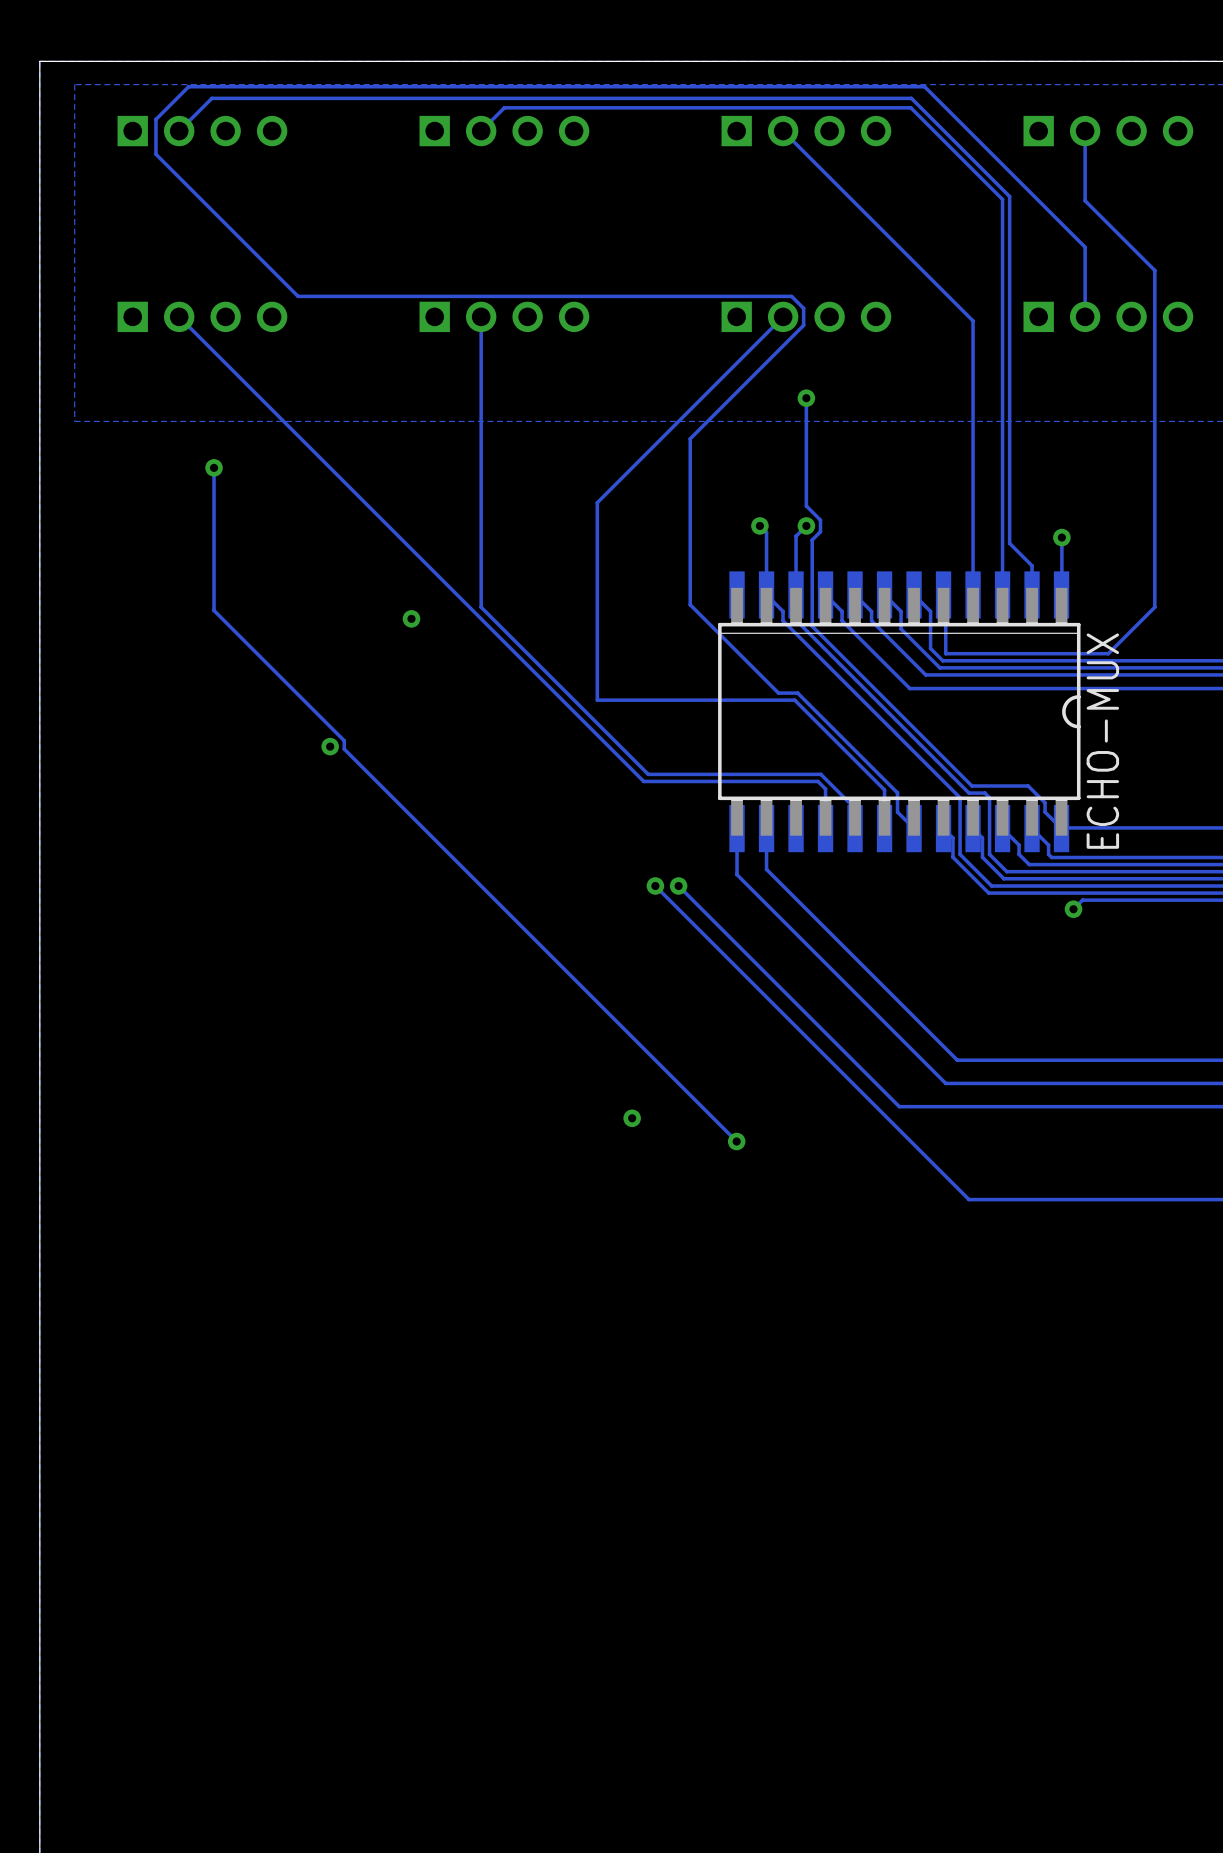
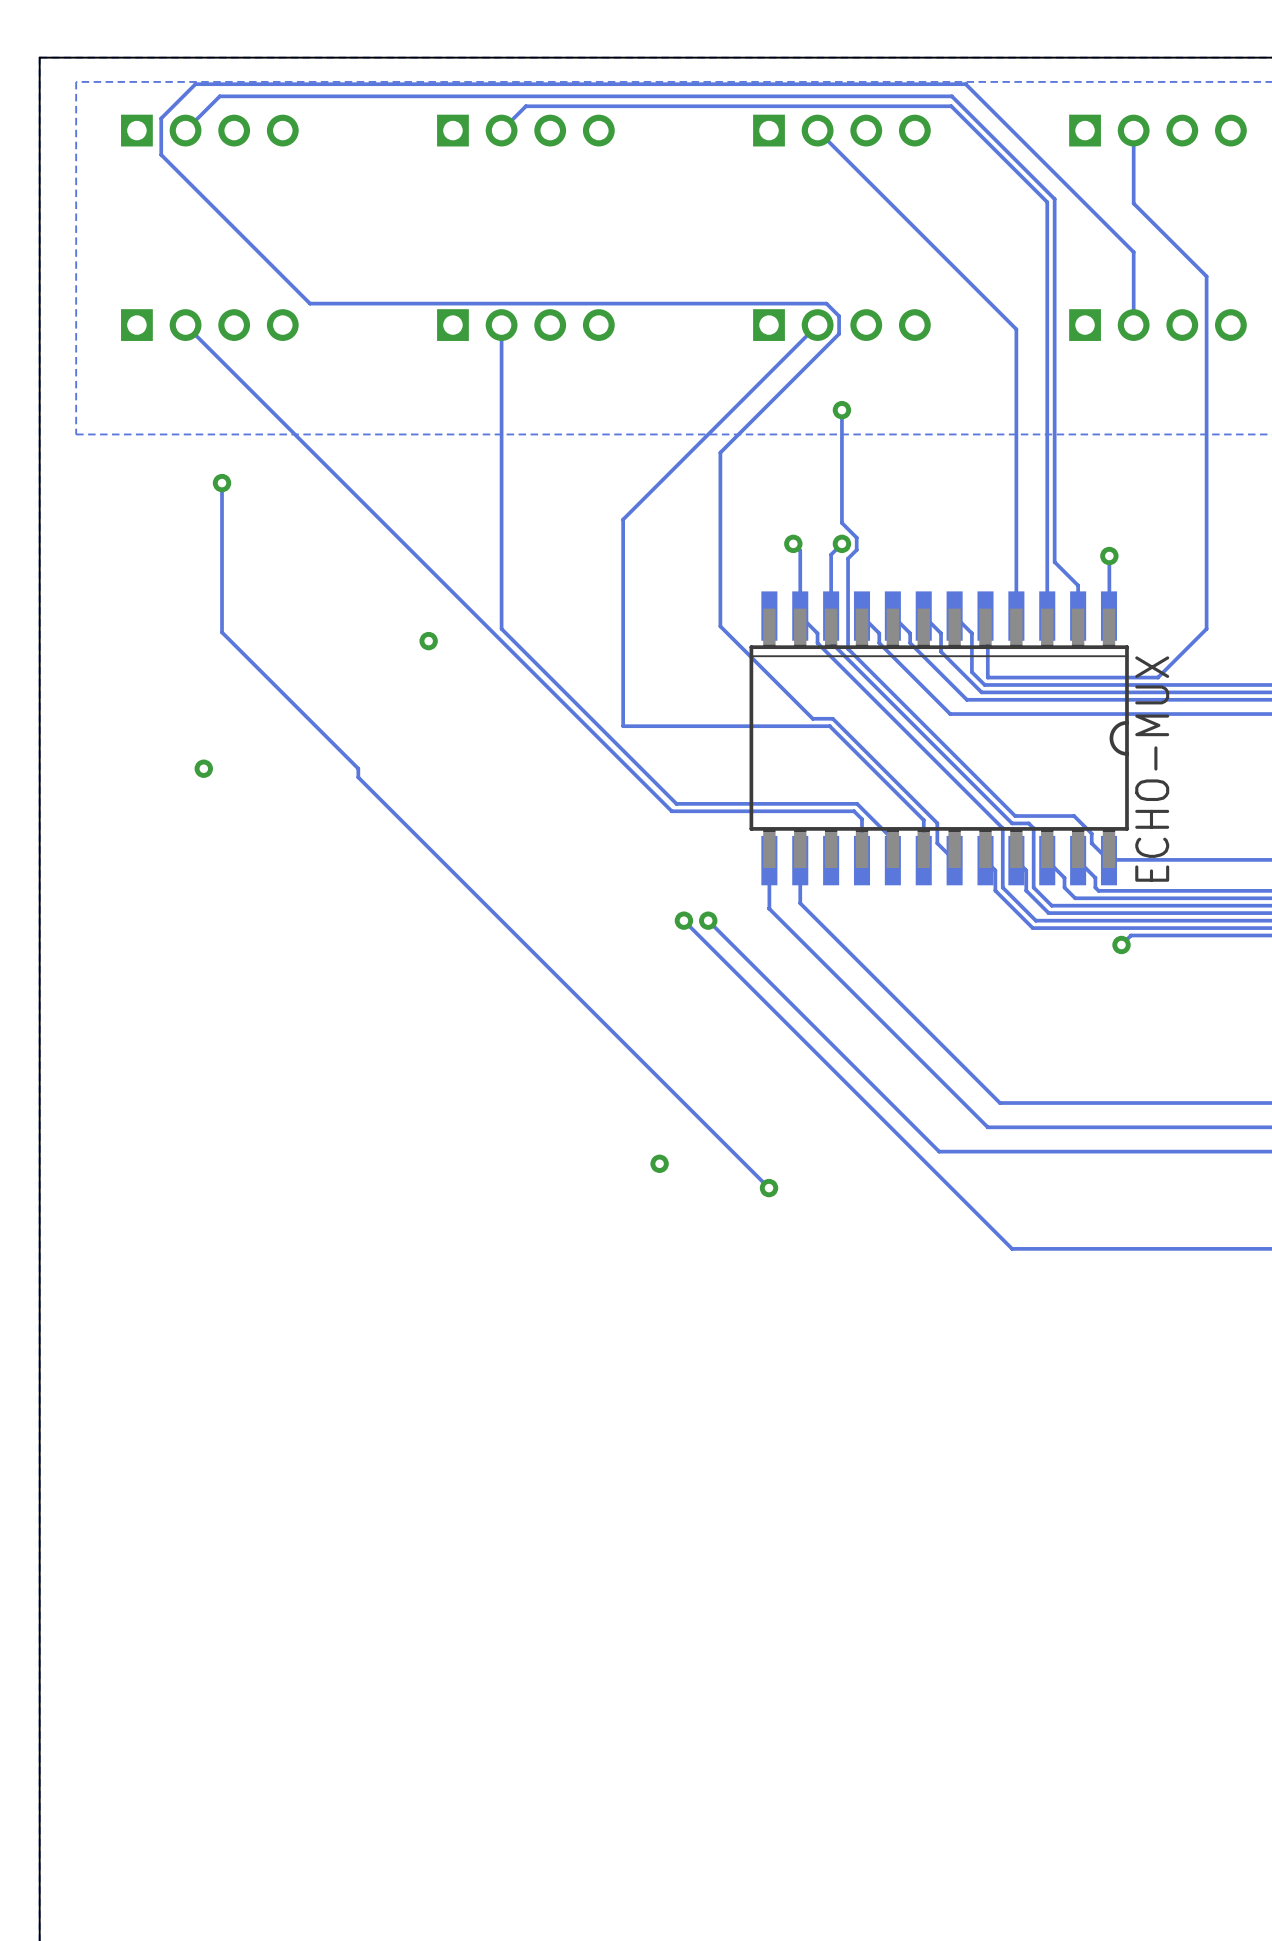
via position: (330, 746) -> (203, 768)

